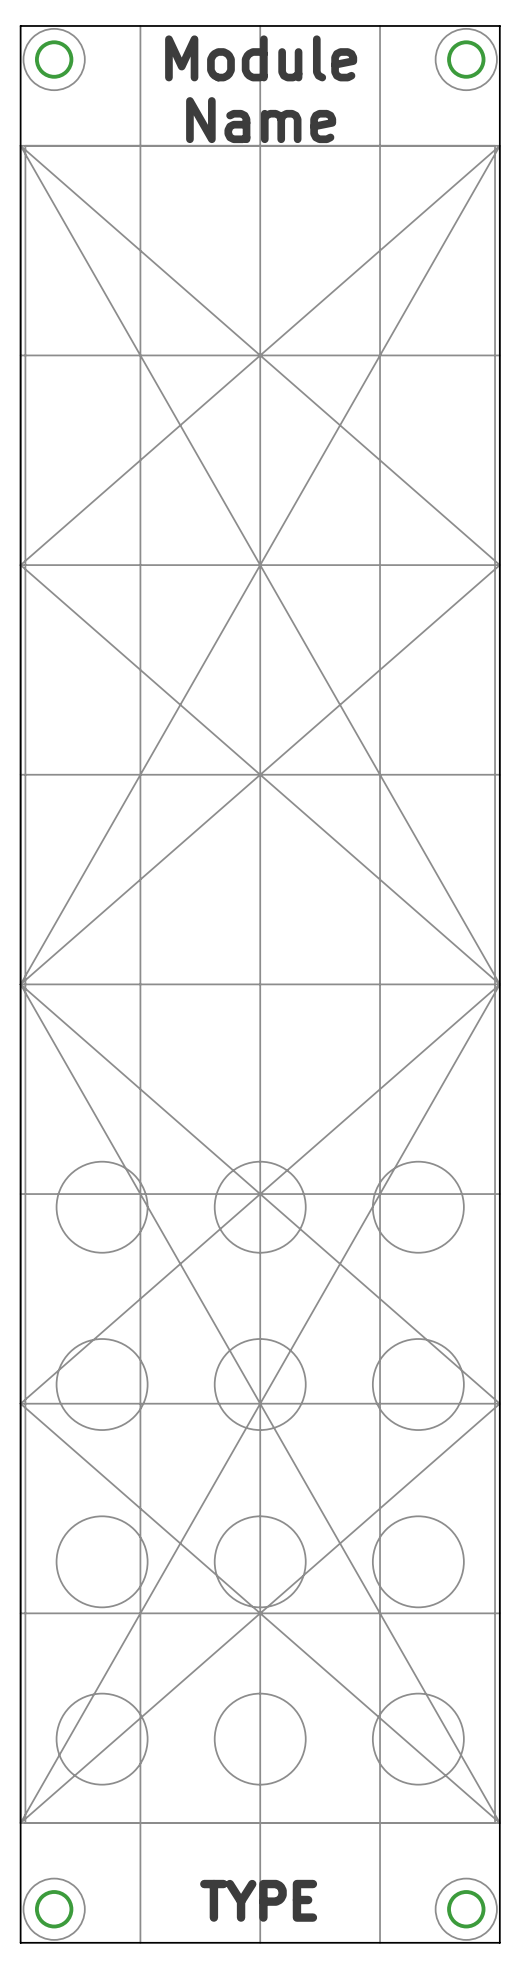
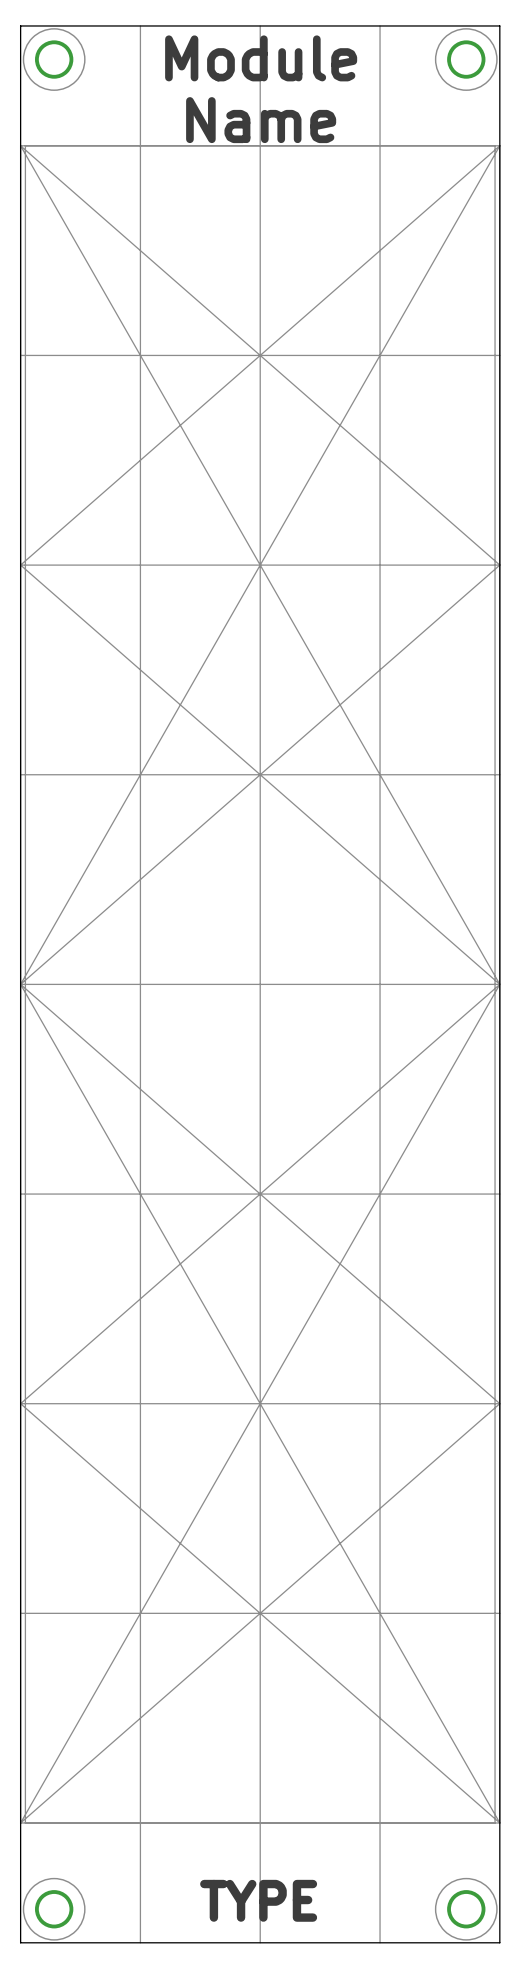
drawing: [56, 1161, 149, 1254] -> none
drawing: [214, 1161, 307, 1254] -> none
drawing: [372, 1161, 465, 1254] -> none
drawing: [56, 1338, 149, 1431] -> none
drawing: [214, 1338, 307, 1431] -> none
drawing: [372, 1338, 465, 1431] -> none
drawing: [56, 1515, 149, 1608] -> none
drawing: [214, 1515, 307, 1608] -> none
drawing: [372, 1515, 465, 1608] -> none
drawing: [56, 1693, 149, 1786] -> none
drawing: [214, 1693, 307, 1786] -> none
drawing: [372, 1693, 465, 1786] -> none

